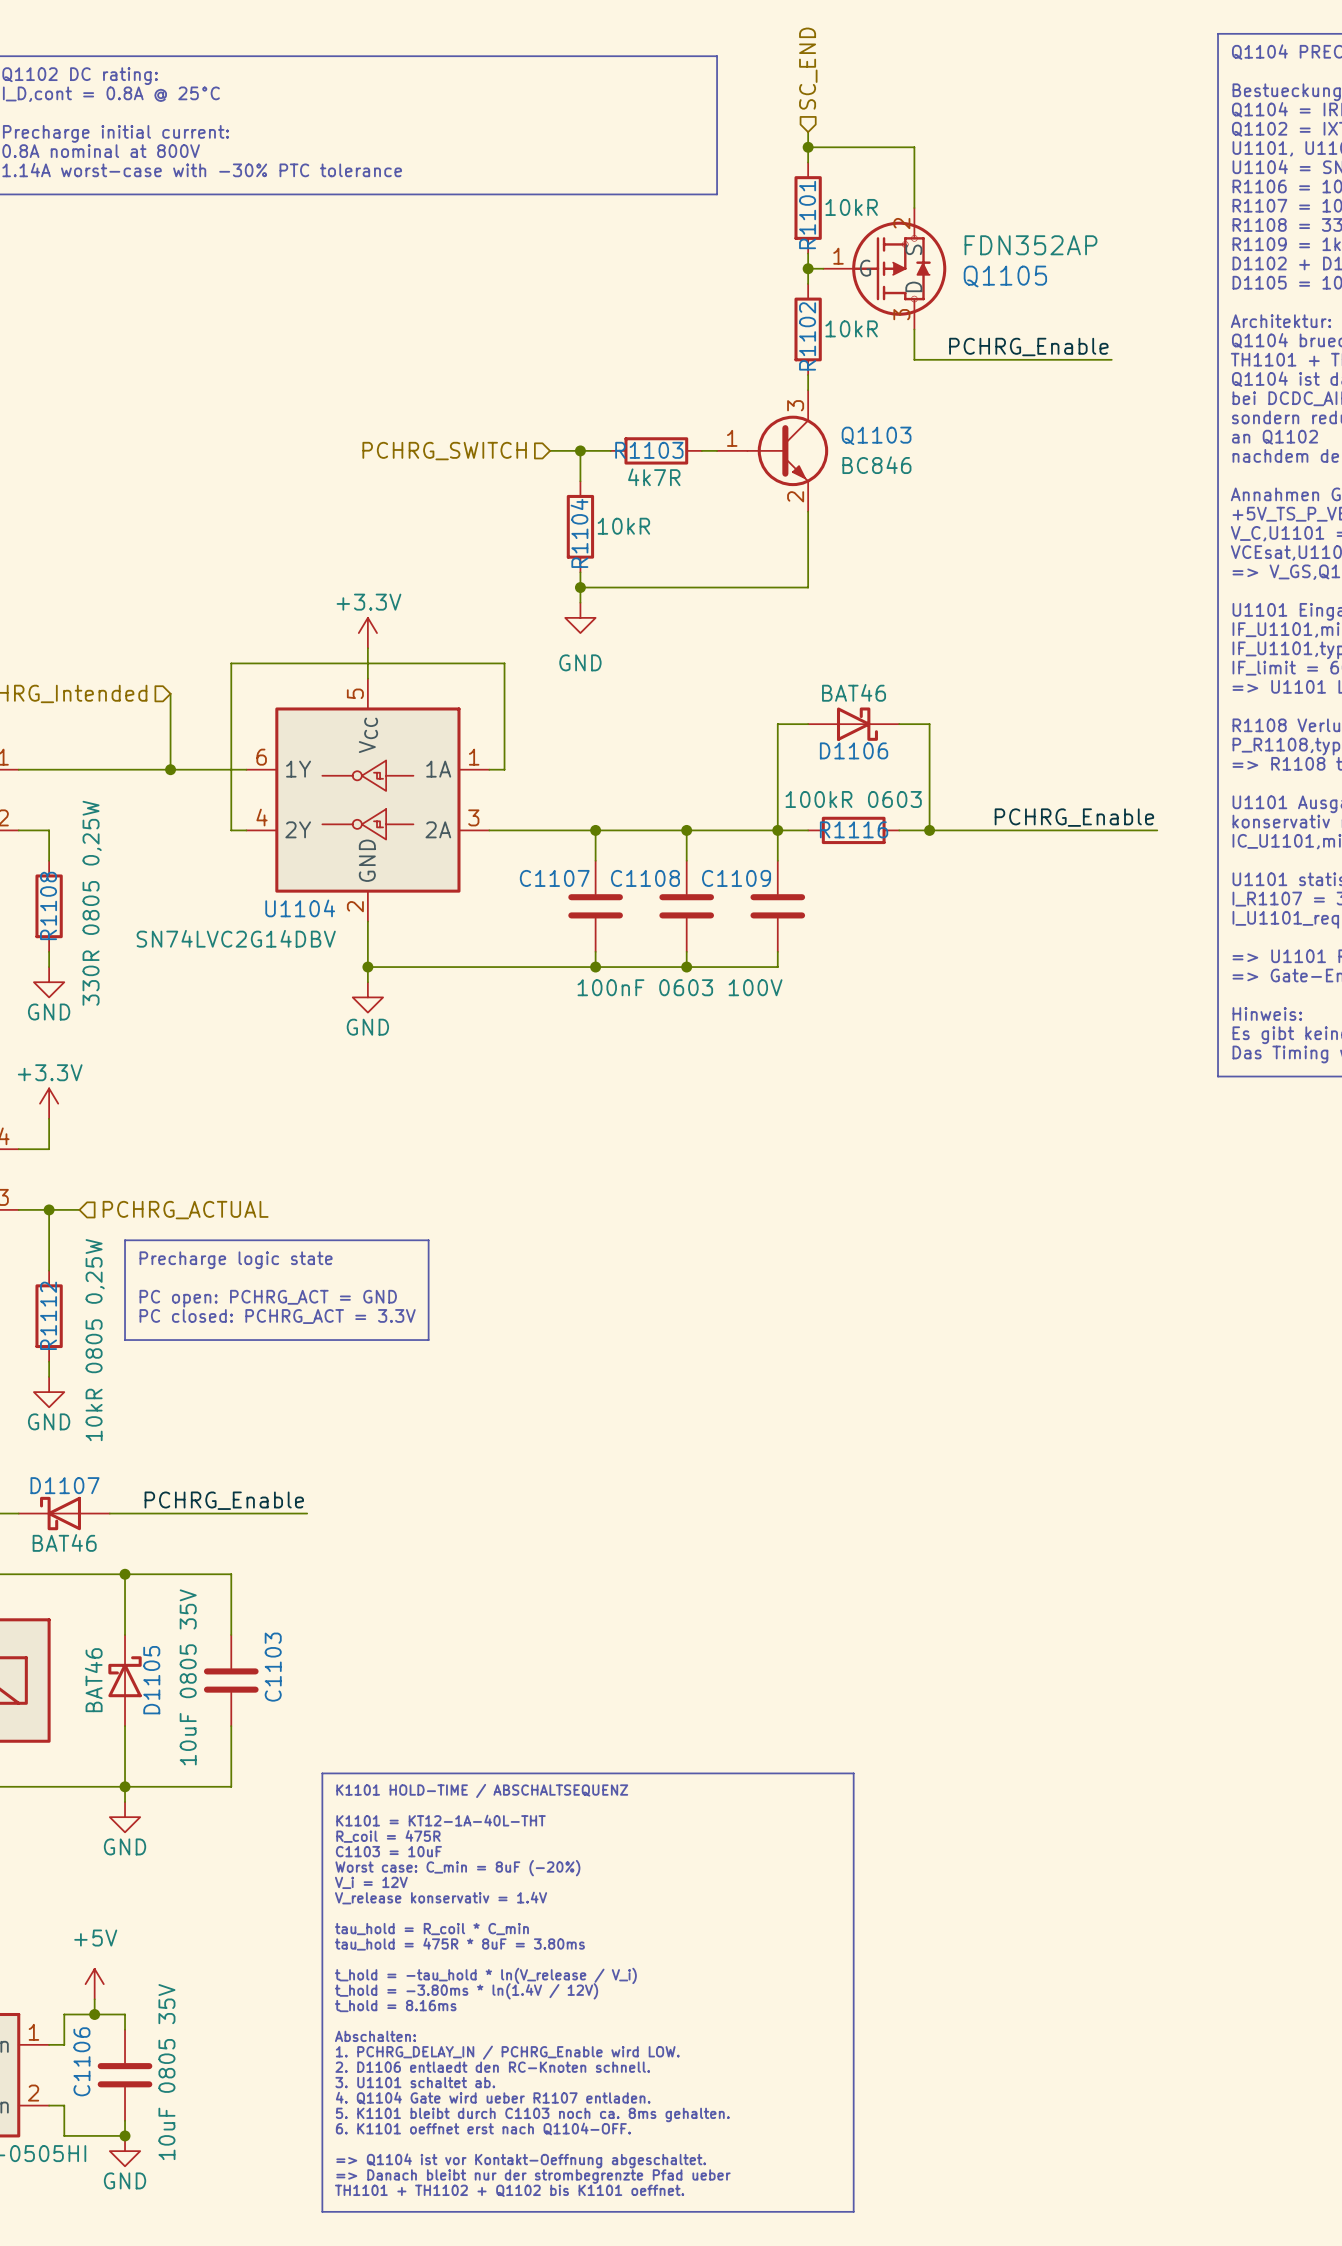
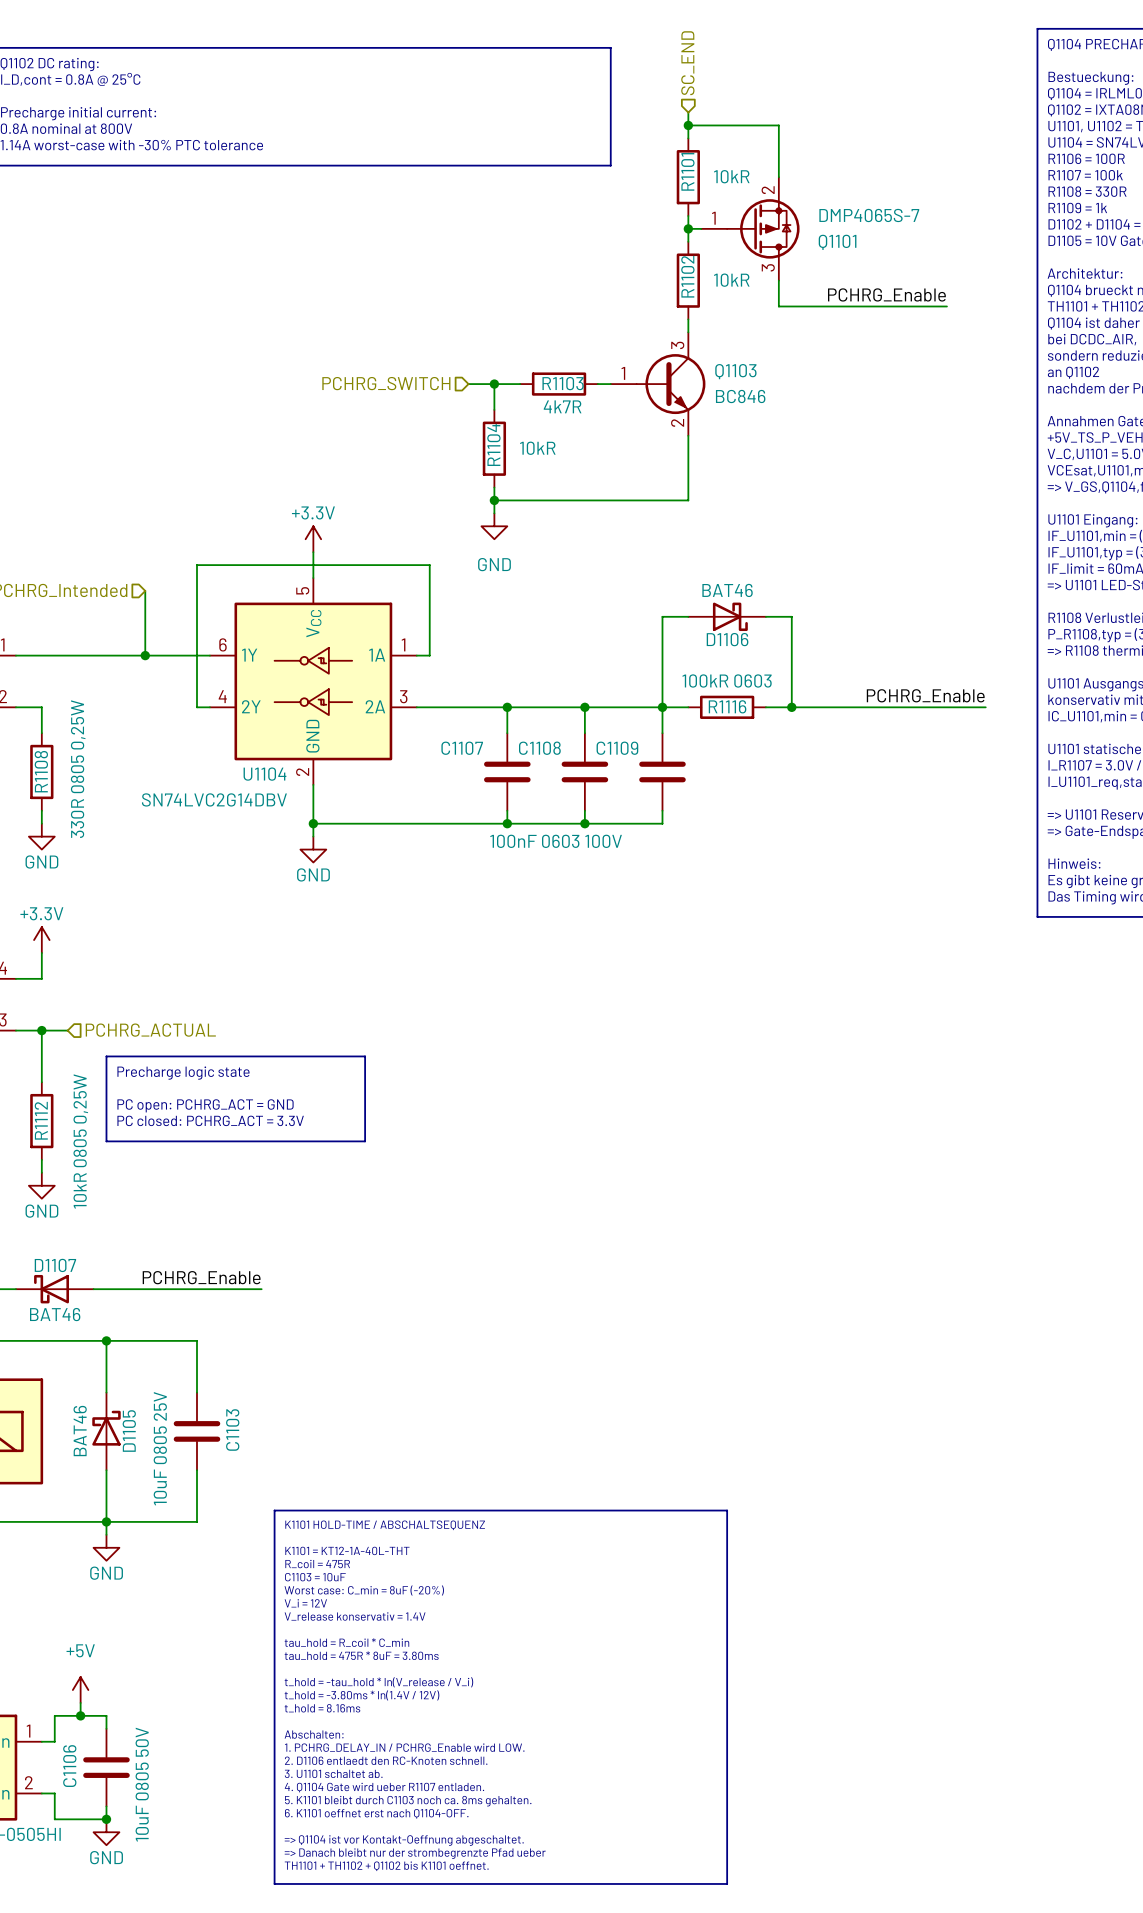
Q1101: none -> DMP4065S-7 (750, 228)
Q1105: FDN352AP (884, 268) -> none
C1103 value: 10uF 0805 35V (188, 1677) -> 10uF 0805 25V (160, 1448)
C1106 value: 10uF 0805 35V (166, 2072) -> 10uF 0805 50V (142, 1784)

